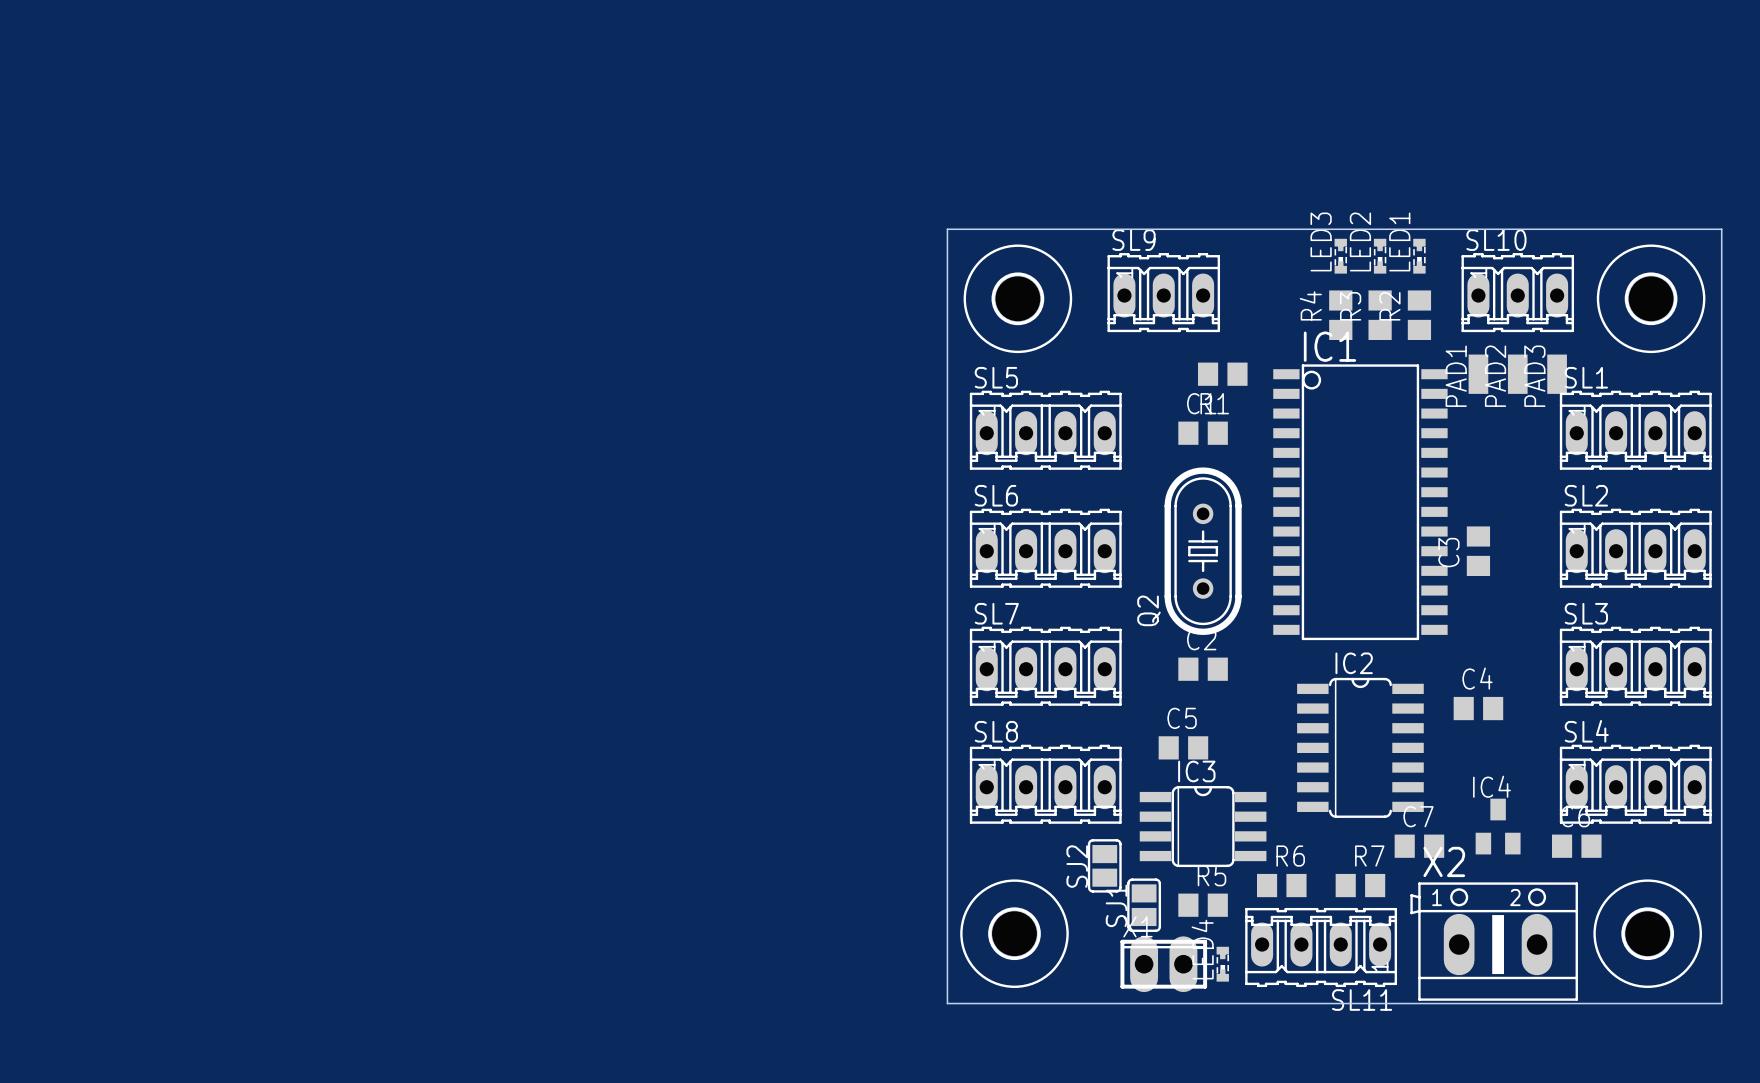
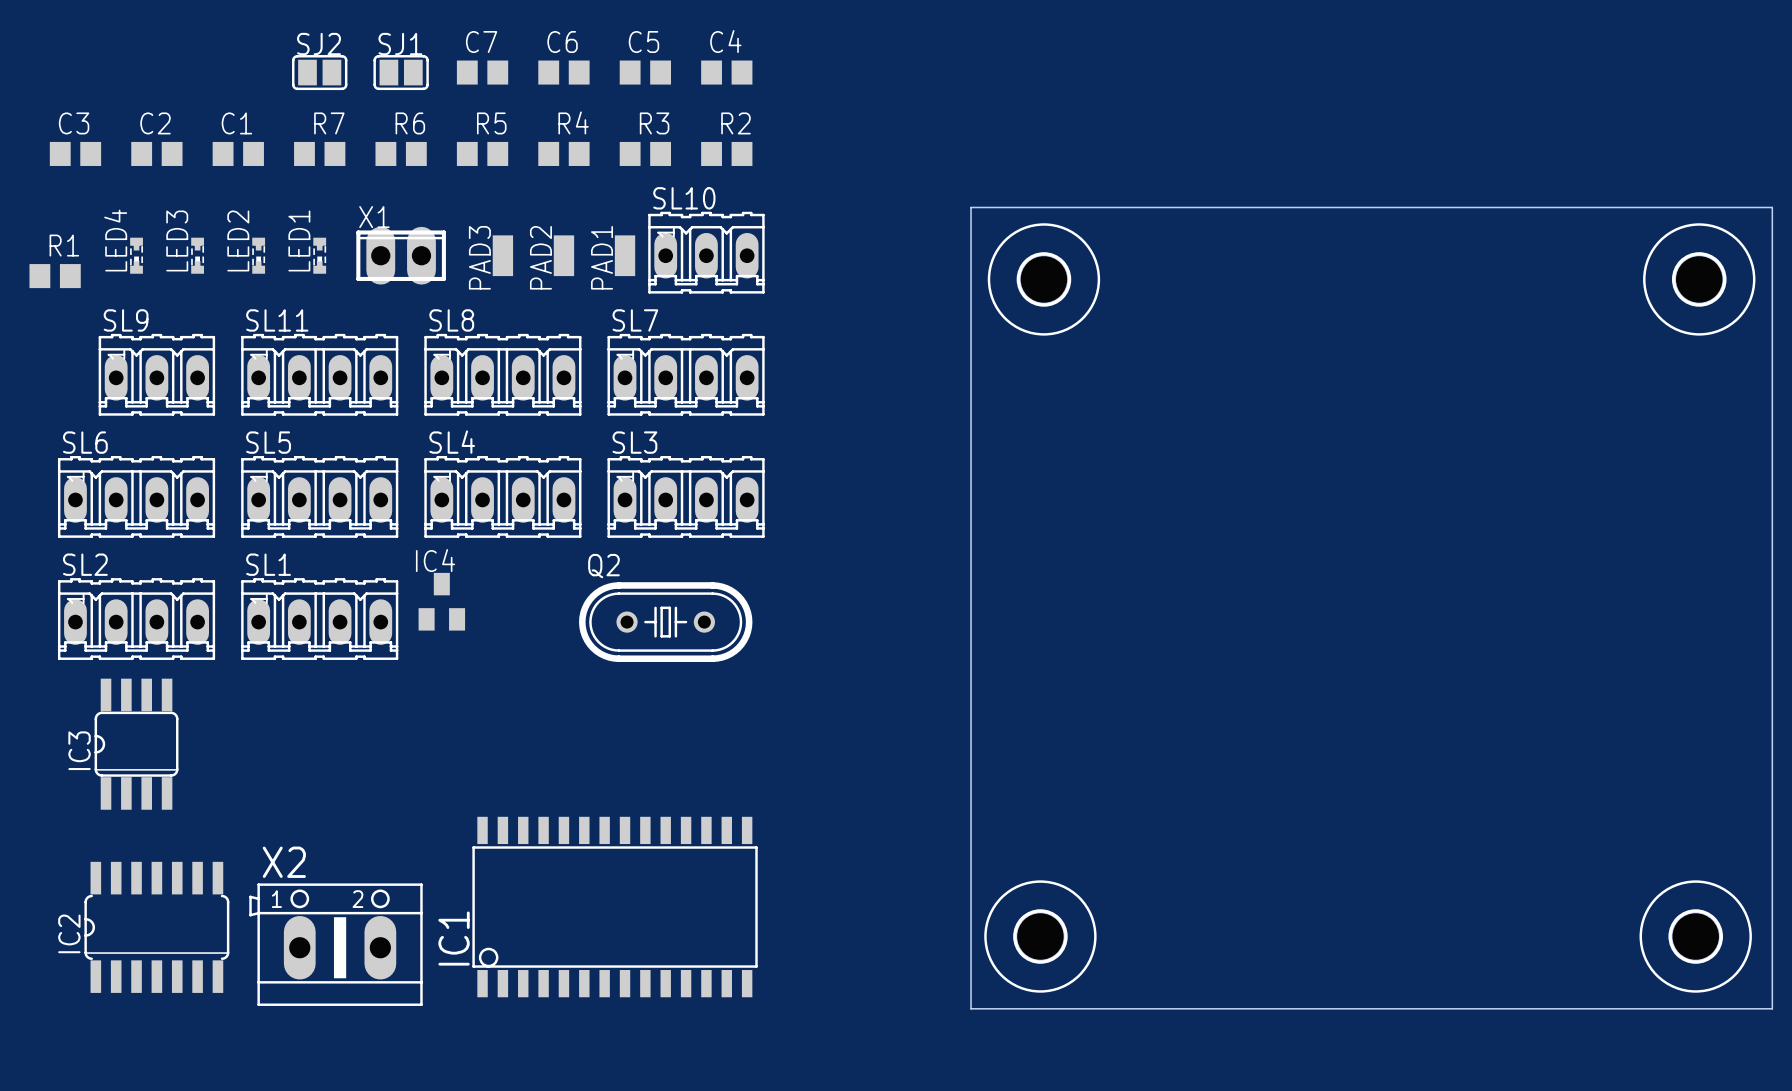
LED3 position: (1340, 256) -> (197, 255)
LED2 position: (1380, 256) -> (258, 255)
LED1 position: (1419, 256) -> (319, 255)
SL9 position: (1163, 292) -> (156, 374)
SL10 position: (1517, 292) -> (706, 252)
R4 rotation: 0° (1340, 315) -> 90° clockwise (563, 153)
R4 position: (1340, 315) -> (563, 153)
R3 rotation: 0° (1380, 315) -> 90° clockwise (645, 153)
R3 position: (1380, 315) -> (645, 153)
R2 rotation: 0° (1419, 315) -> 90° clockwise (726, 153)
R2 position: (1419, 315) -> (726, 153)
R1 position: (1222, 374) -> (55, 276)
PAD1 position: (1478, 374) -> (625, 255)
PAD2 position: (1517, 374) -> (563, 255)
PAD3 position: (1557, 374) -> (502, 255)
R1 name position: R1 (1214, 403) -> R1 (64, 245)
SL5 position: (1045, 430) -> (319, 496)
SL1 position: (1635, 430) -> (319, 619)
C1 position: (1203, 433) -> (238, 153)
IC1 rotation: 0° (1360, 502) -> 90° counterclockwise (615, 907)
IC1 position: (1360, 502) -> (615, 907)
SL6 position: (1045, 548) -> (136, 496)
SL2 position: (1635, 548) -> (136, 619)
Q2 rotation: 0° (1203, 551) -> 90° clockwise (665, 622)
Q2 position: (1203, 551) -> (665, 622)
C3 rotation: 0° (1478, 551) -> 90° clockwise (75, 153)
C3 position: (1478, 551) -> (75, 153)
SL7 position: (1045, 666) -> (686, 374)
SL3 position: (1635, 666) -> (686, 496)
C2 position: (1203, 669) -> (156, 153)
C4 position: (1478, 708) -> (726, 72)
C5 position: (1183, 747) -> (645, 72)
IC2 rotation: 0° (1360, 747) -> 90° counterclockwise (156, 927)
IC2 position: (1360, 747) -> (156, 927)
SL8 position: (1045, 784) -> (502, 374)
SL4 position: (1635, 784) -> (502, 496)
IC3 rotation: 0° (1203, 826) -> 90° counterclockwise (136, 744)
IC3 position: (1203, 826) -> (136, 744)
IC4 position: (1498, 826) -> (441, 601)
C7 position: (1419, 846) -> (482, 72)
C6 position: (1576, 846) -> (563, 72)
SJ2 rotation: 0° (1104, 865) -> 90° clockwise (319, 72)
SJ2 position: (1104, 865) -> (319, 72)
R6 position: (1281, 885) -> (401, 153)
R7 position: (1360, 885) -> (319, 153)
SJ1 rotation: 0° (1144, 905) -> 90° clockwise (401, 72)
SJ1 position: (1144, 905) -> (401, 72)
R5 position: (1203, 905) -> (482, 153)
SL11 footprint: [1245, 907, 1398, 988] -> [241, 333, 399, 416]
X2 position: (1494, 941) -> (335, 944)
X1 position: (1163, 964) -> (401, 255)
LED4 position: (1222, 964) -> (136, 255)
SL11 name position: SL11 (1362, 1000) -> SL11 (277, 320)

